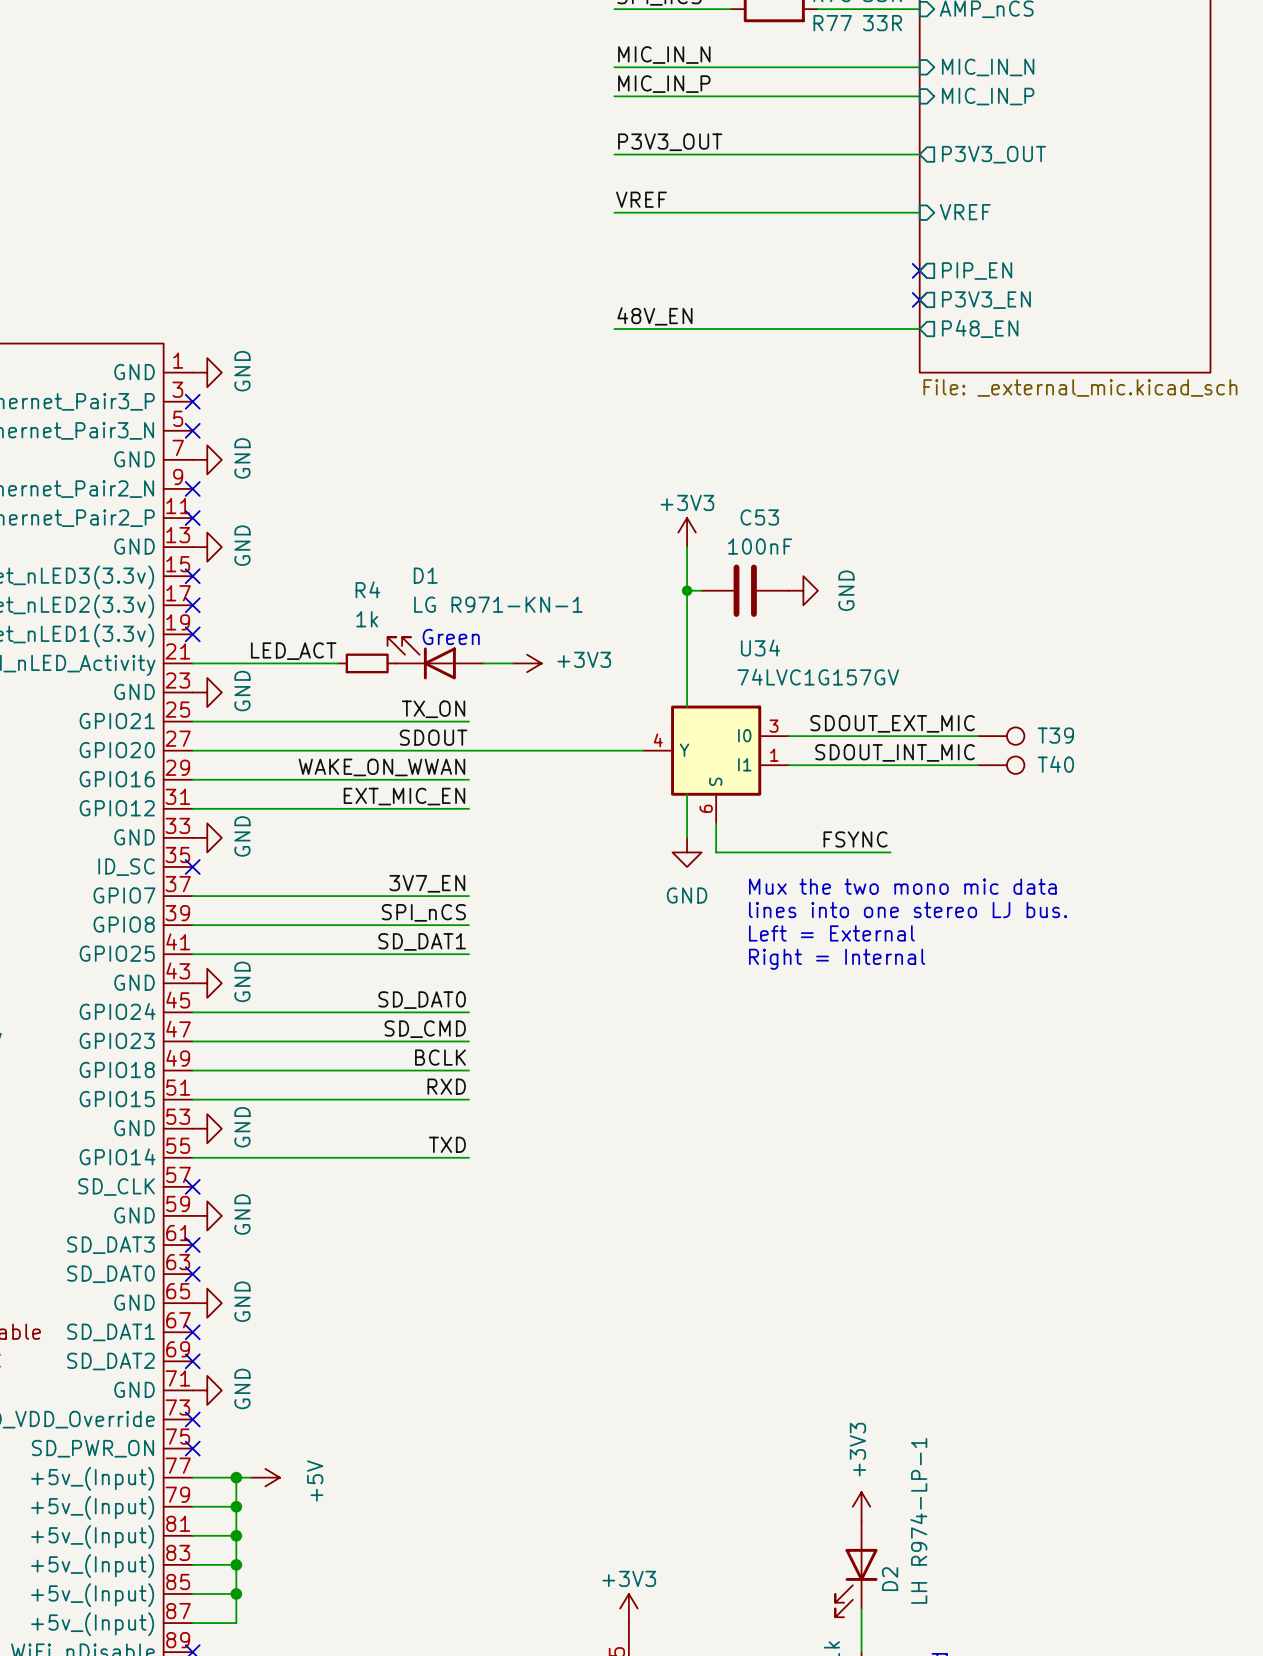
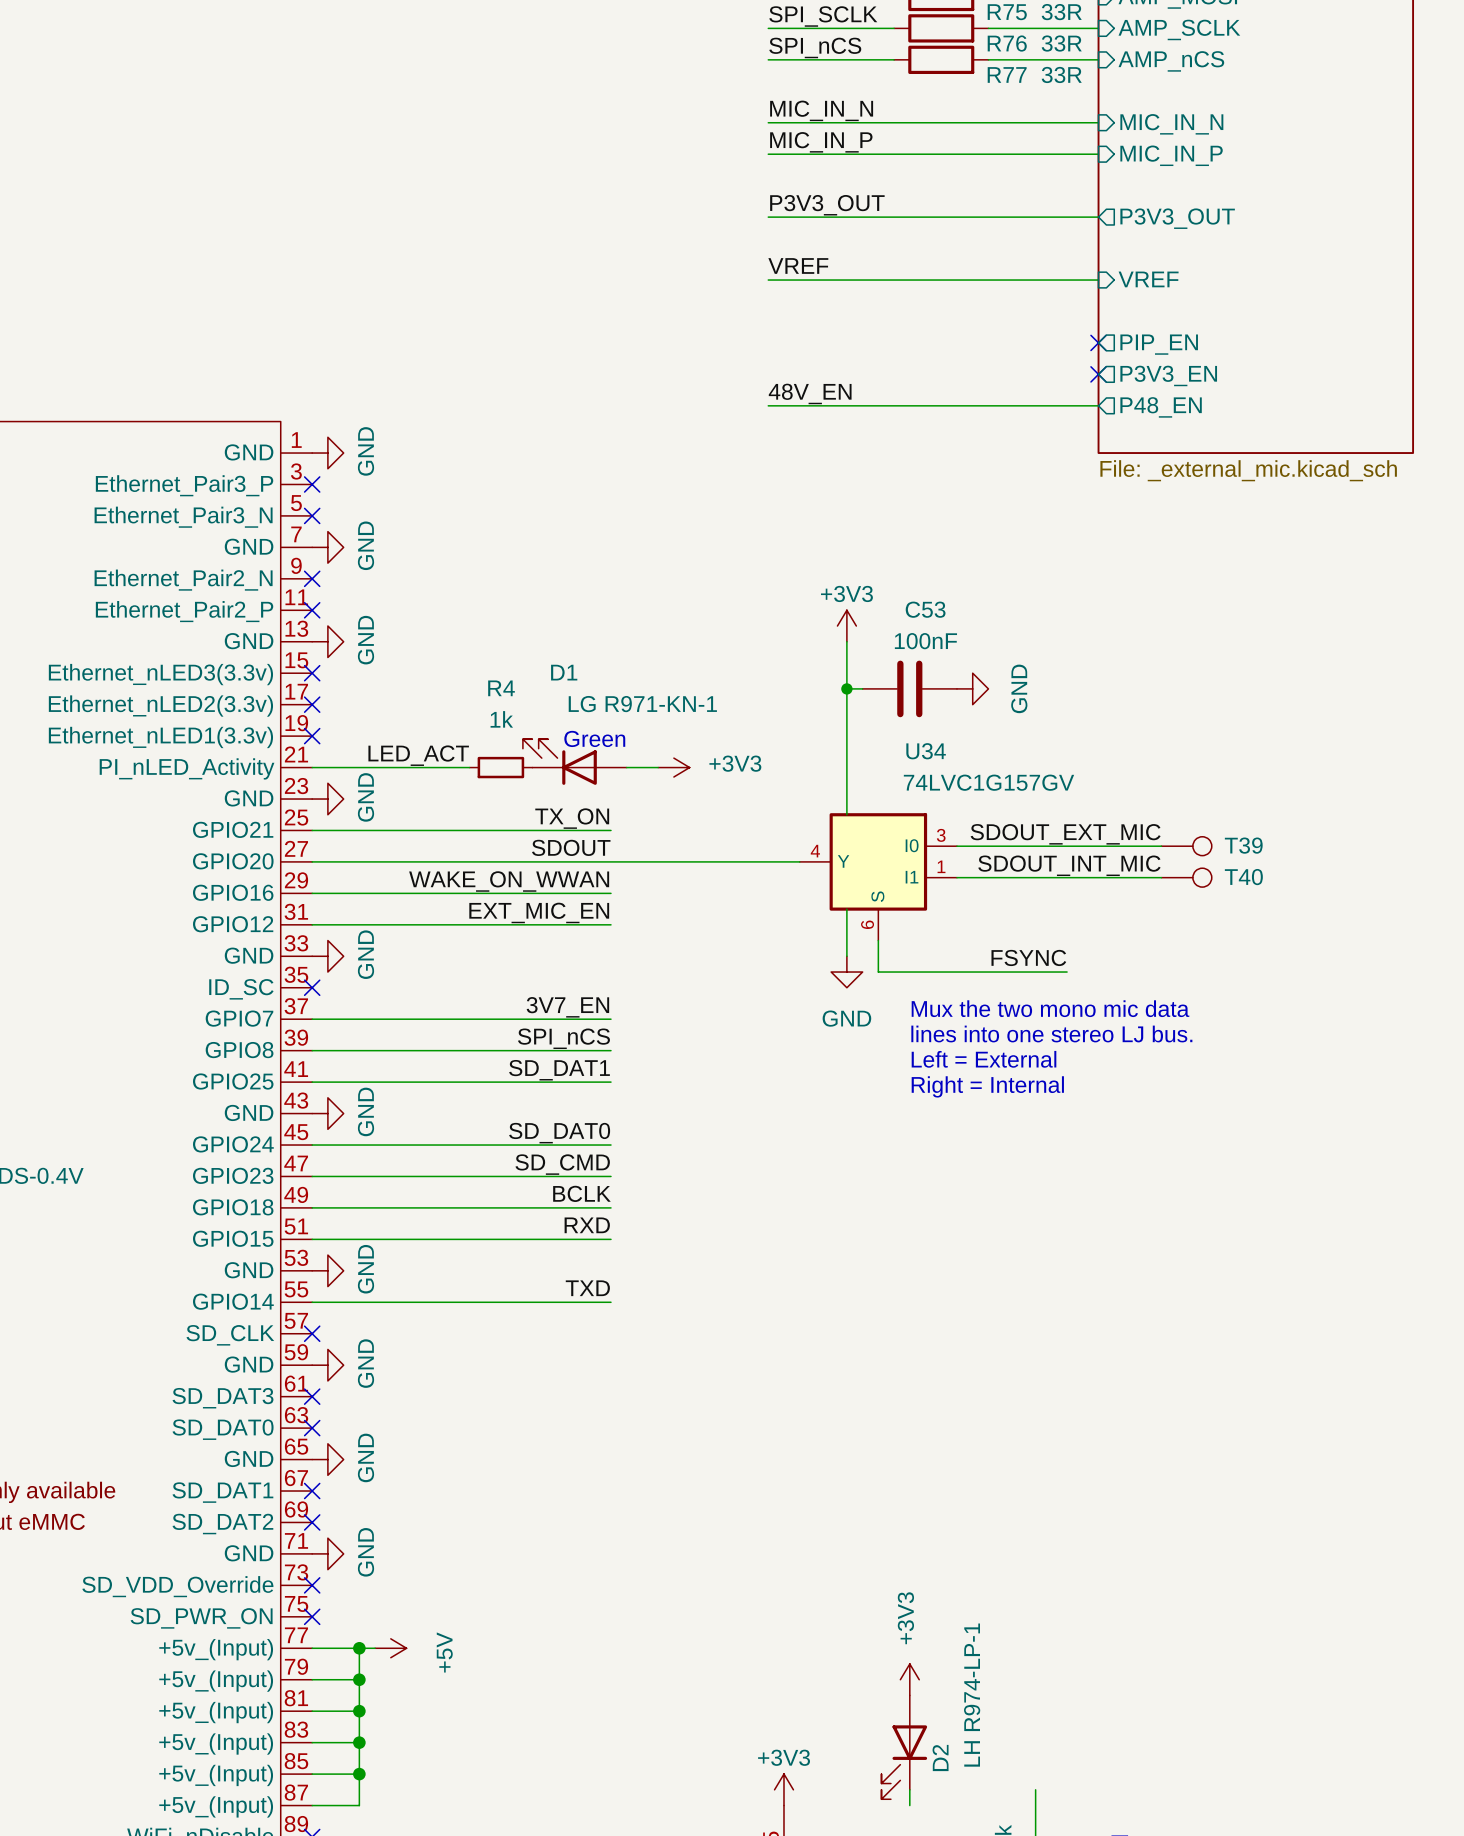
power symbol position: +3V3 (861, 1506) -> +3V3 (909, 1679)
D2 position: (856, 1569) -> (904, 1747)
wire: none -> (909, 1789) (909, 1805)

